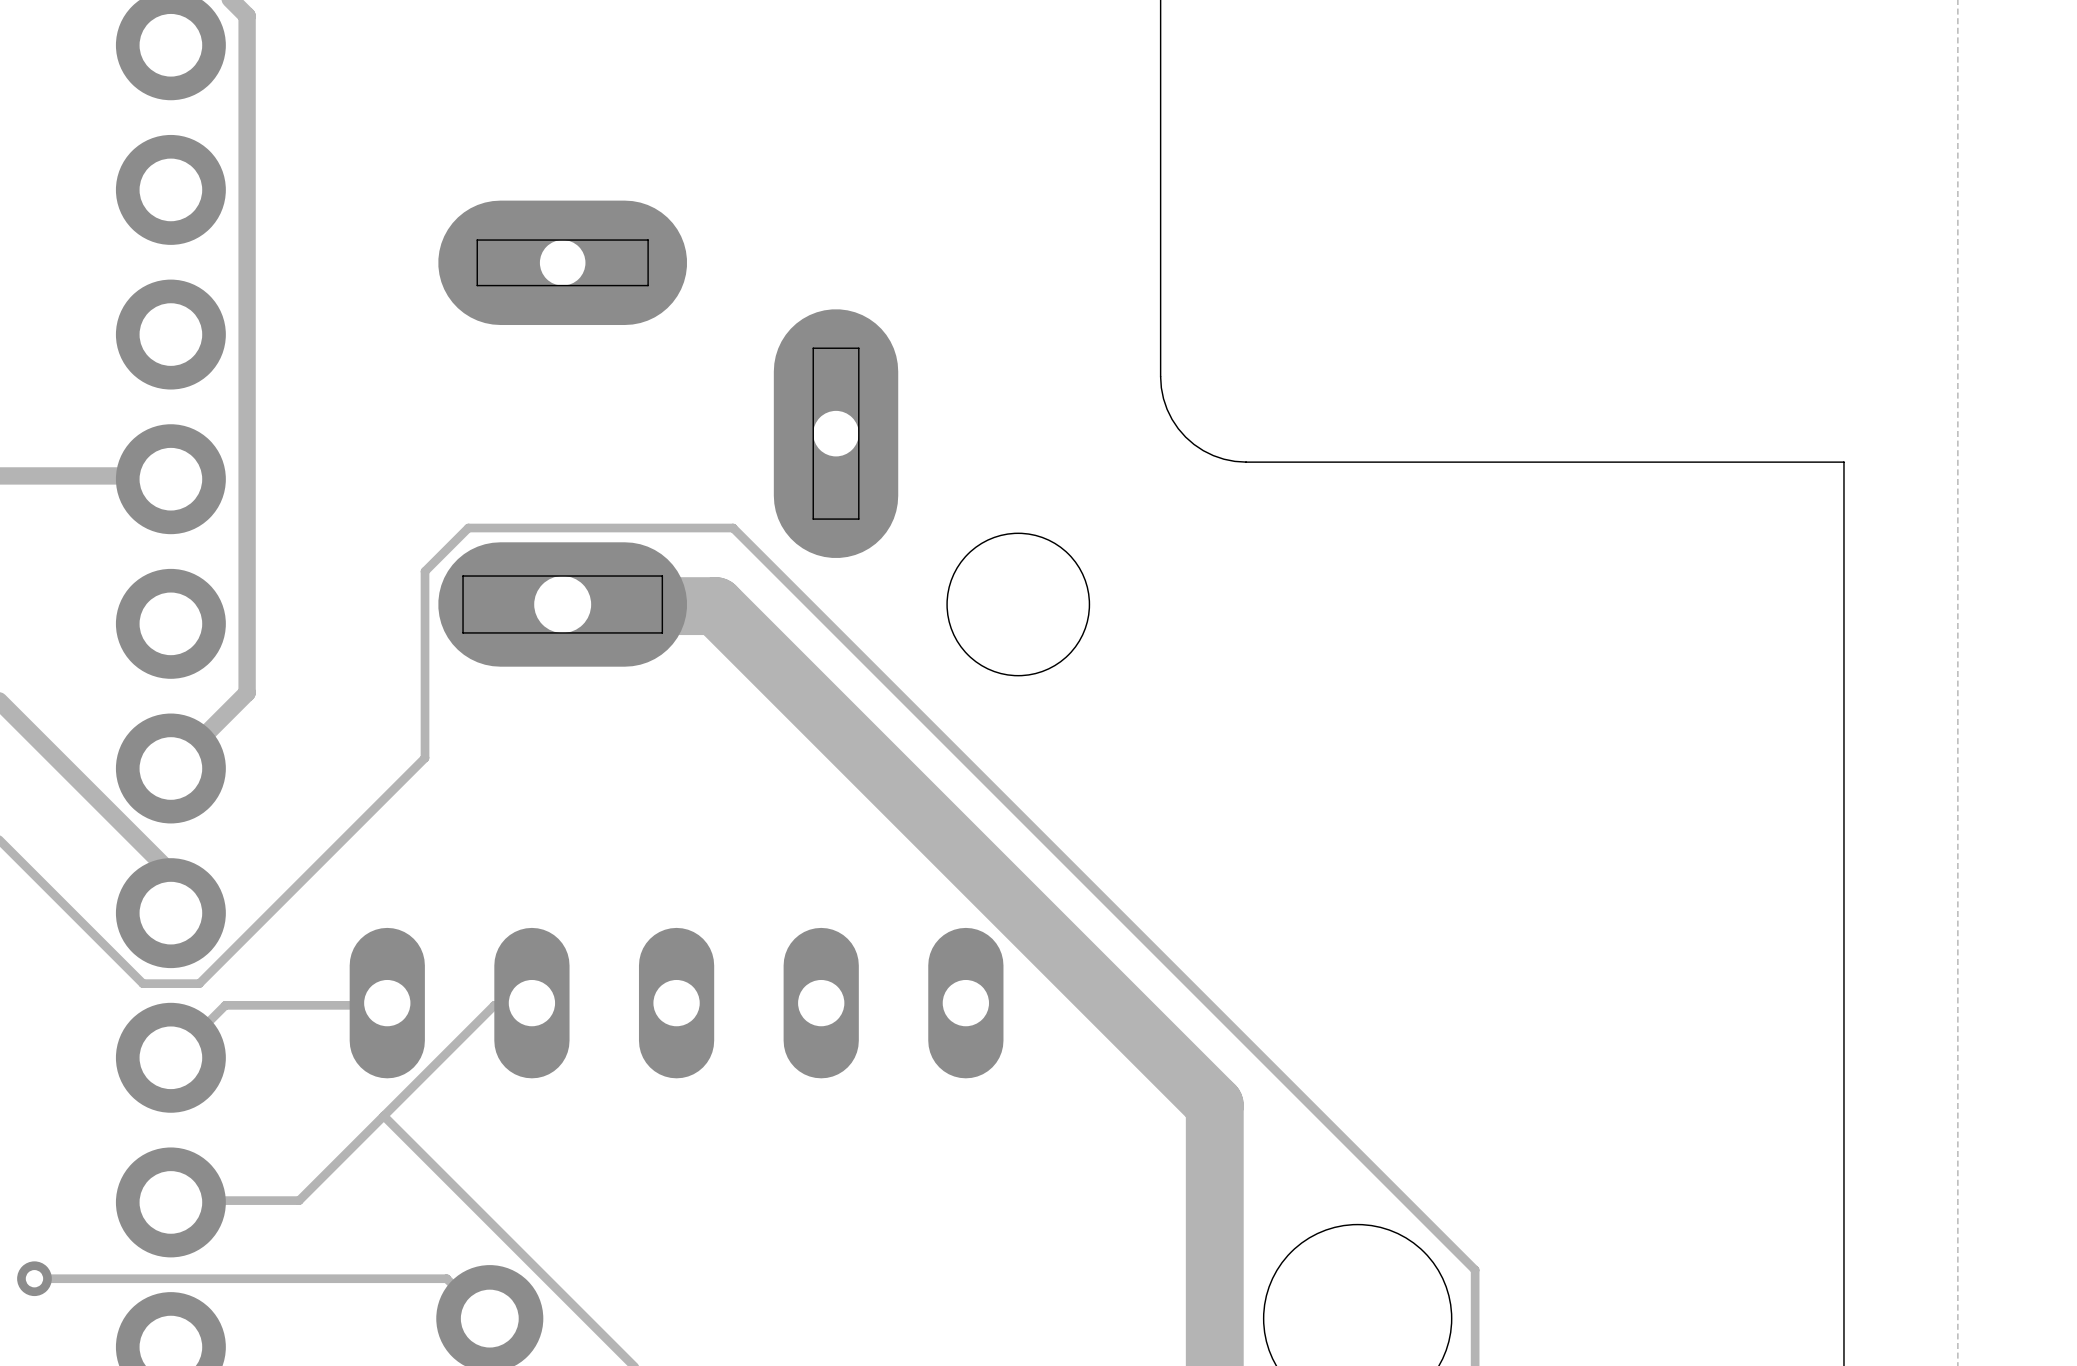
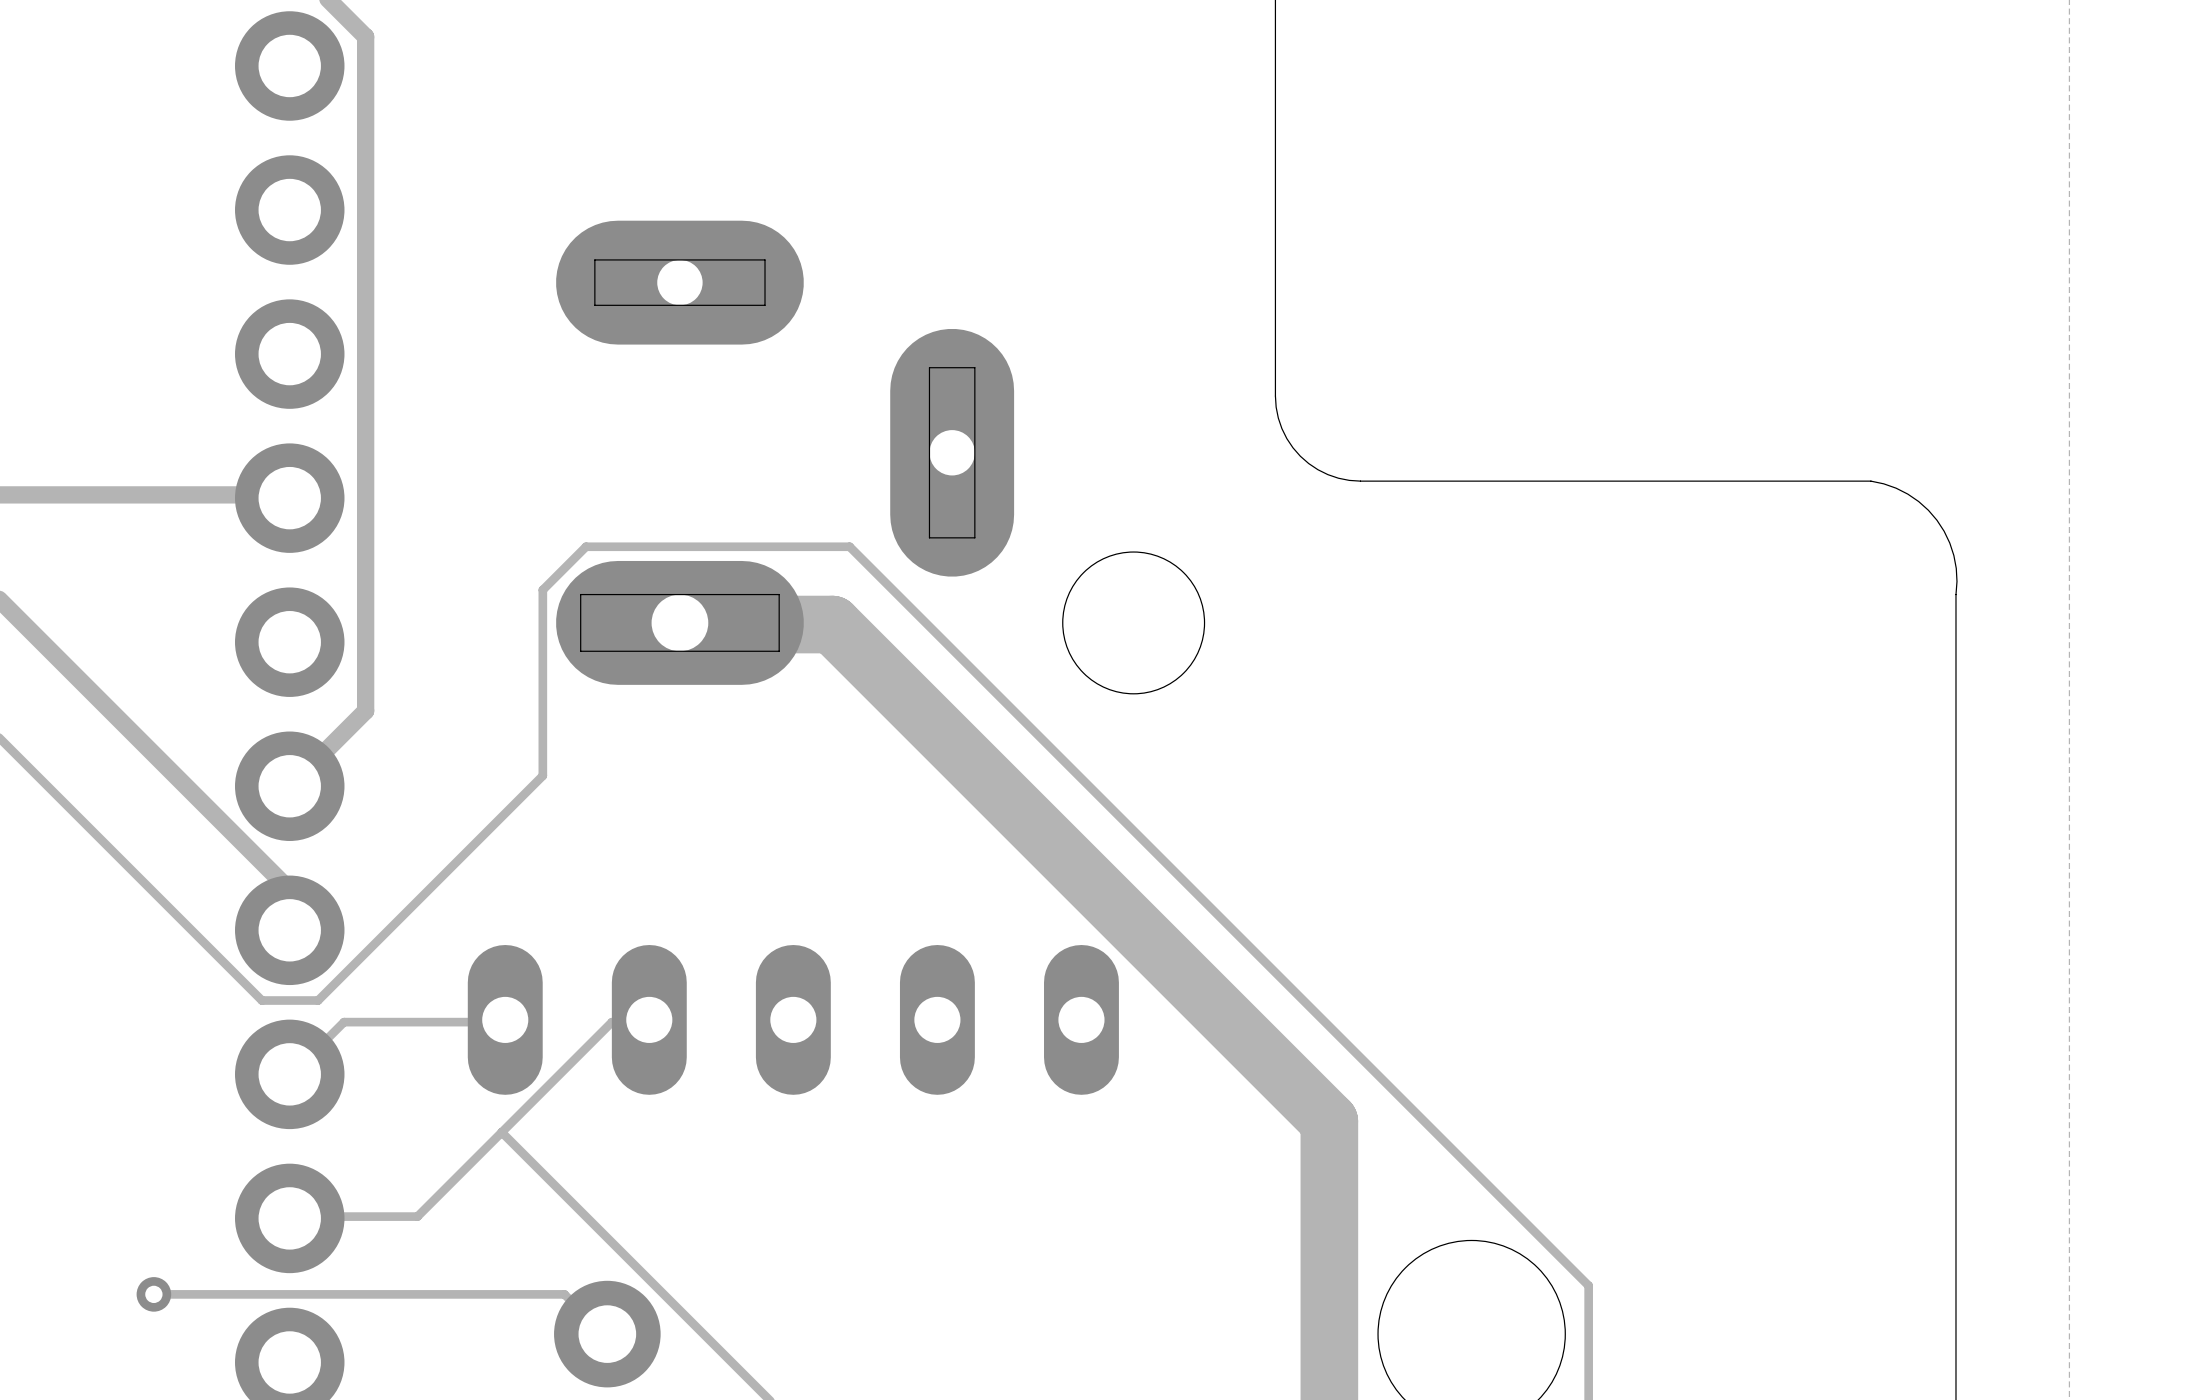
board edge: (1758, 462) (1843, 462) (1843, 576) -> (1870, 481) (1896, 488) (1907, 494) (1928, 510) (1936, 520) (1944, 531) (1953, 555) (1956, 581) (1955, 594)

